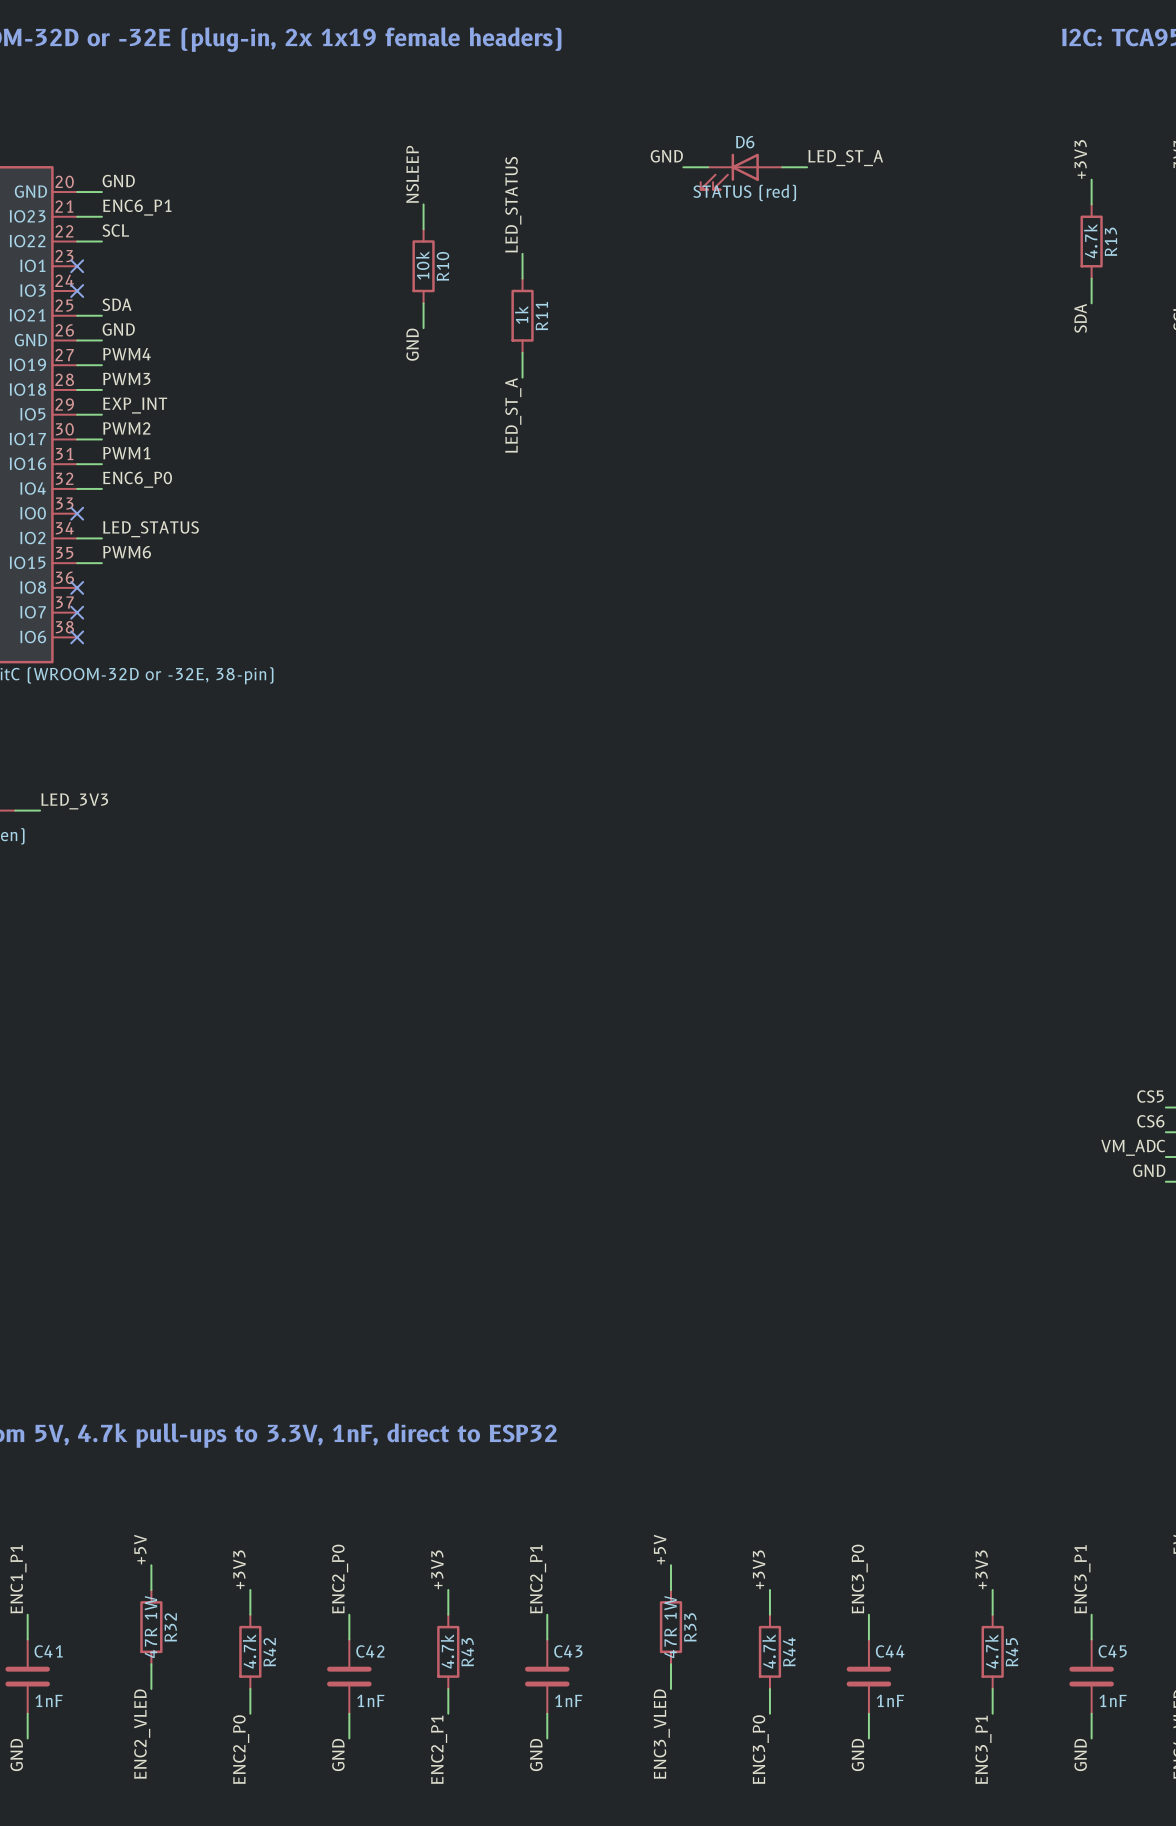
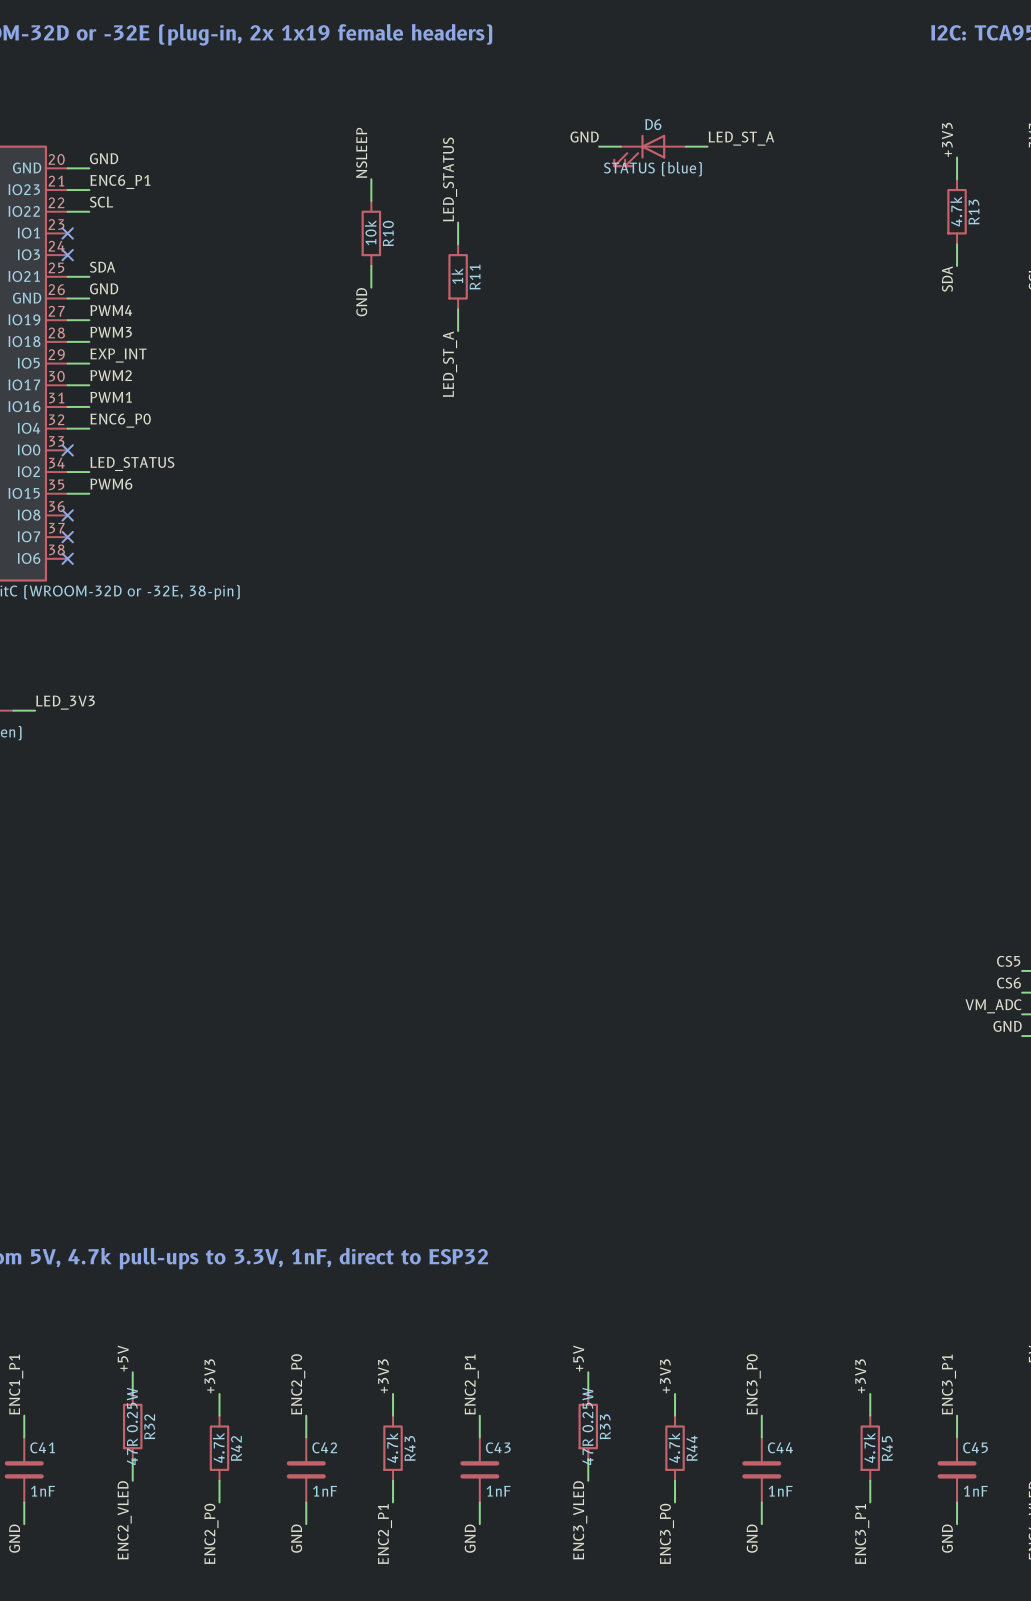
D6 value: STATUS (red) (744, 192) -> STATUS (blue) (652, 169)
R32 value: 47R 1W (150, 1627) -> 47R 0.25W (132, 1426)
R33 value: 47R 1W (670, 1627) -> 47R 0.25W (587, 1426)

